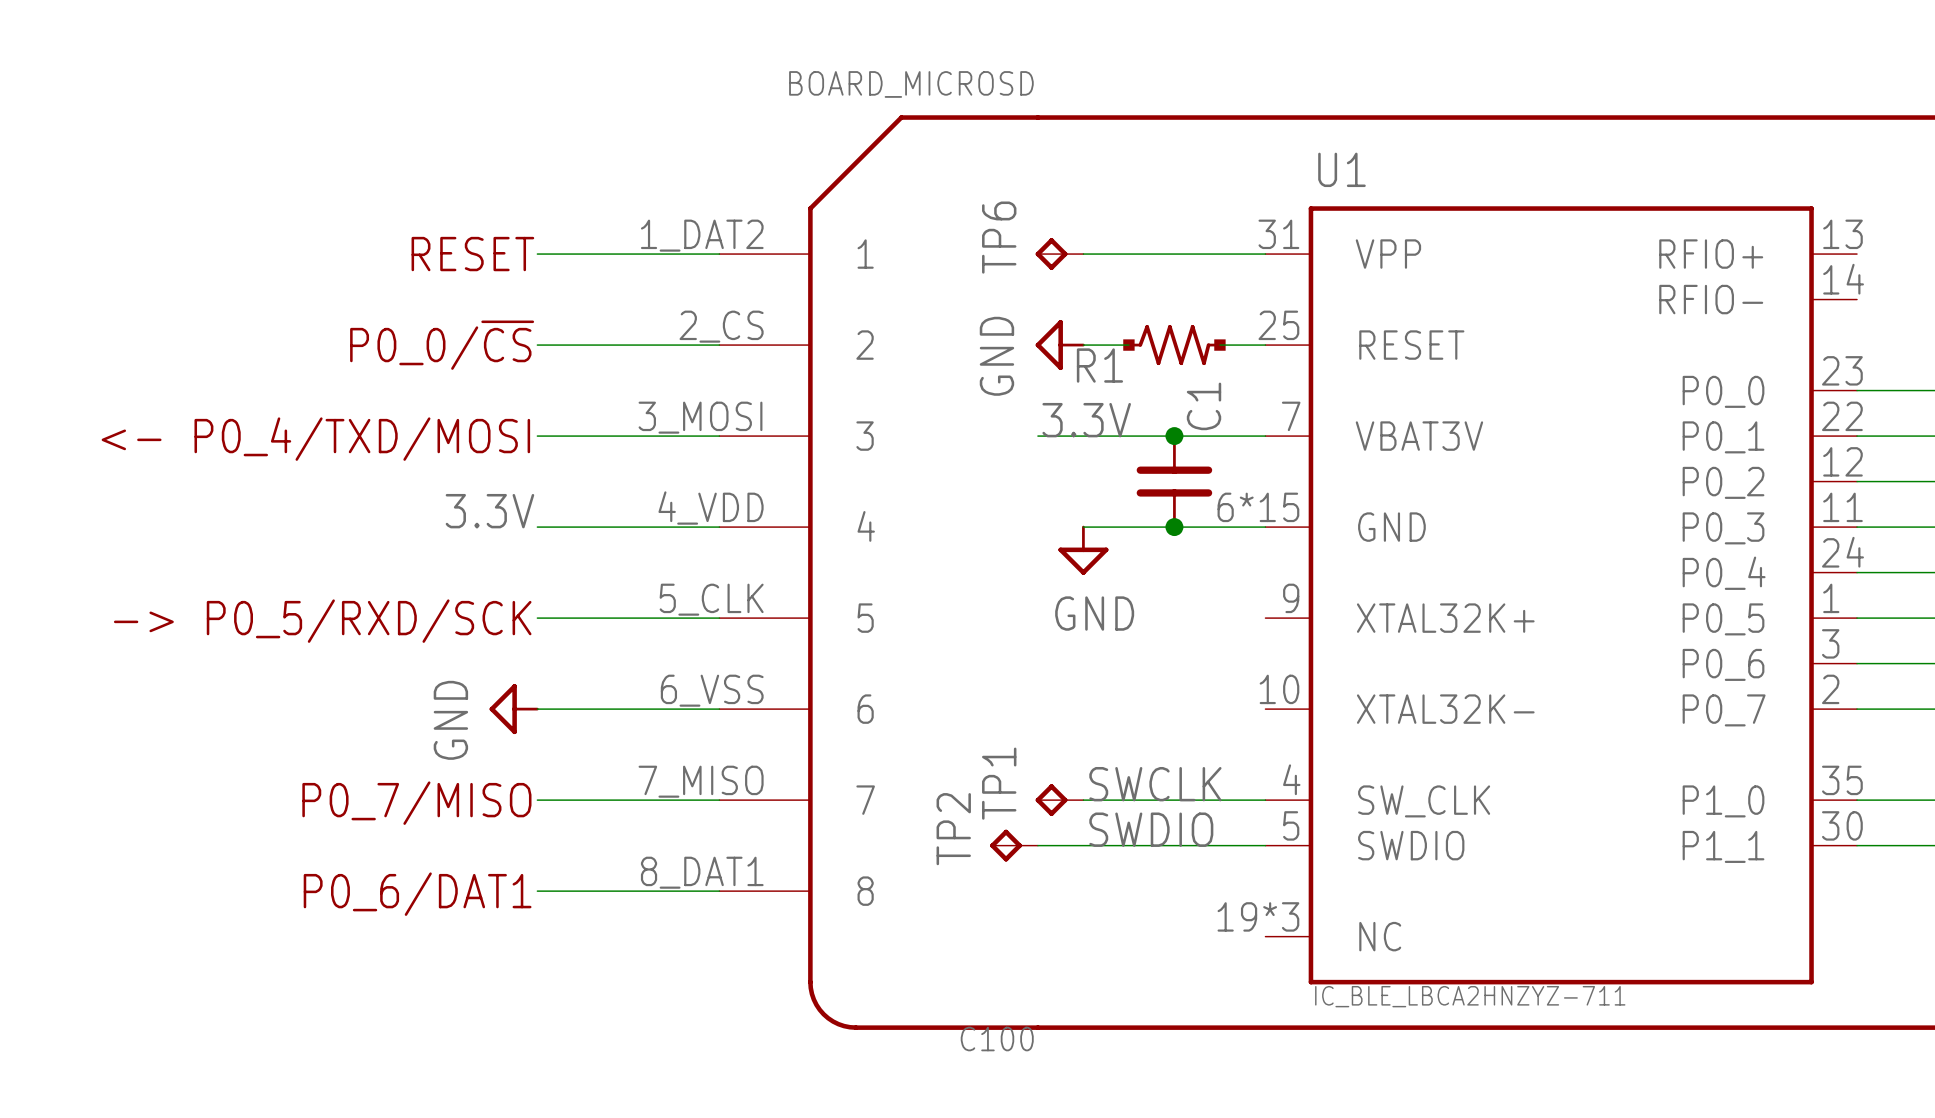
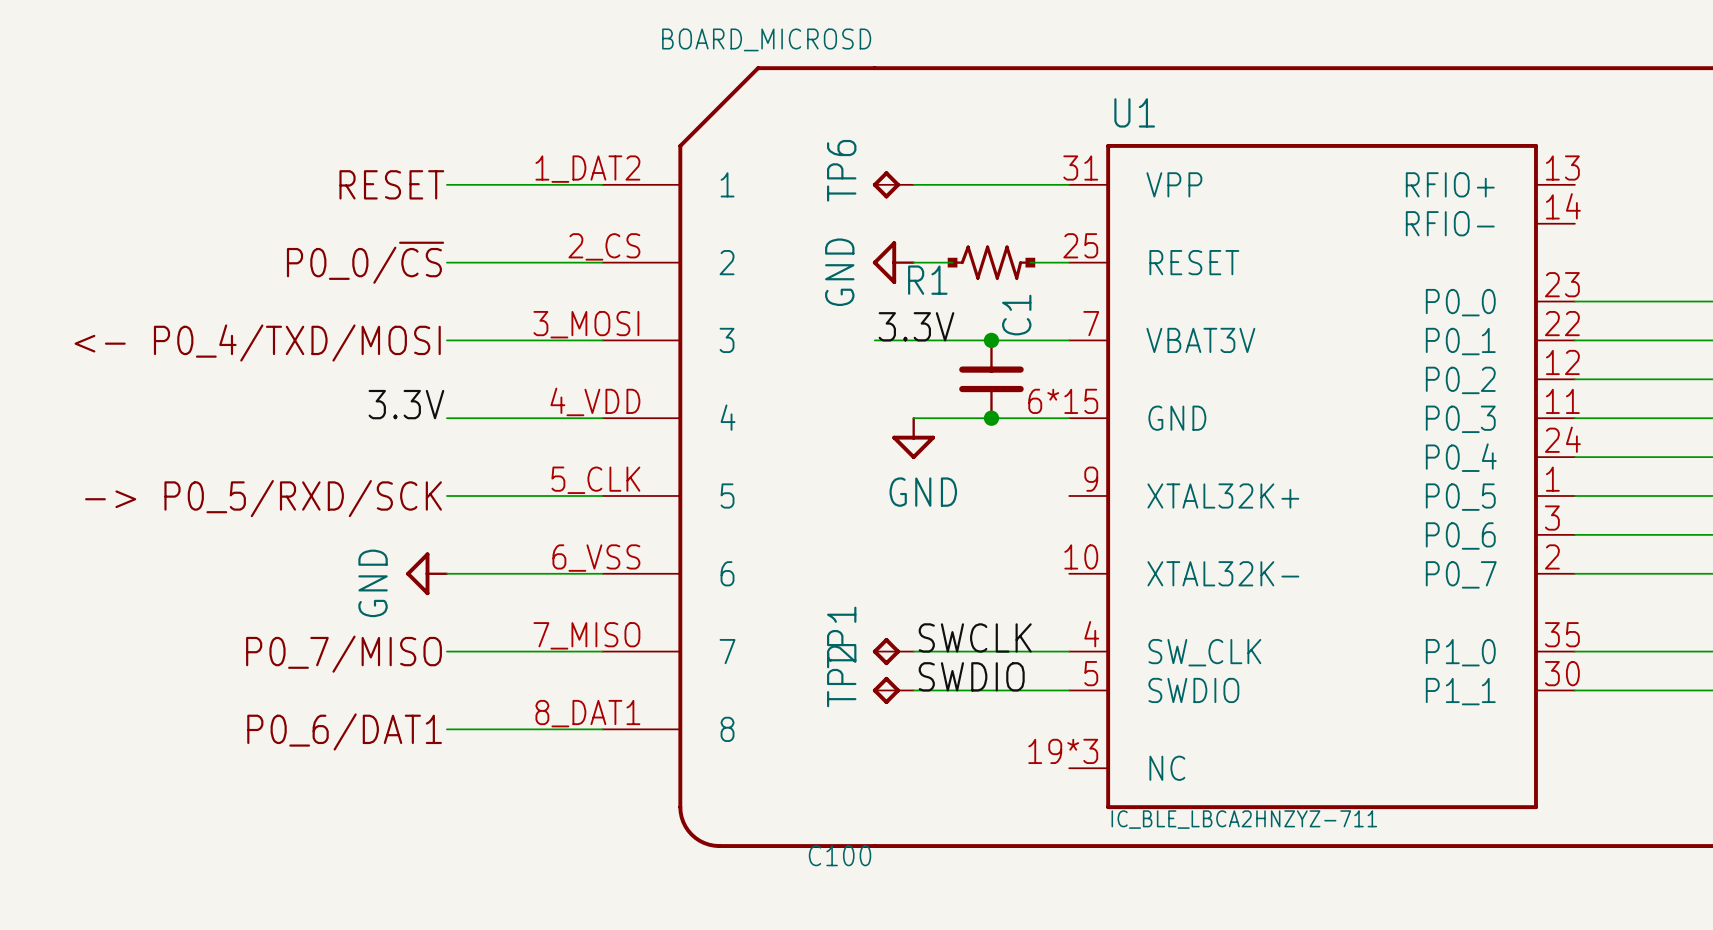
TP2 position: (1014, 845) -> (893, 690)

